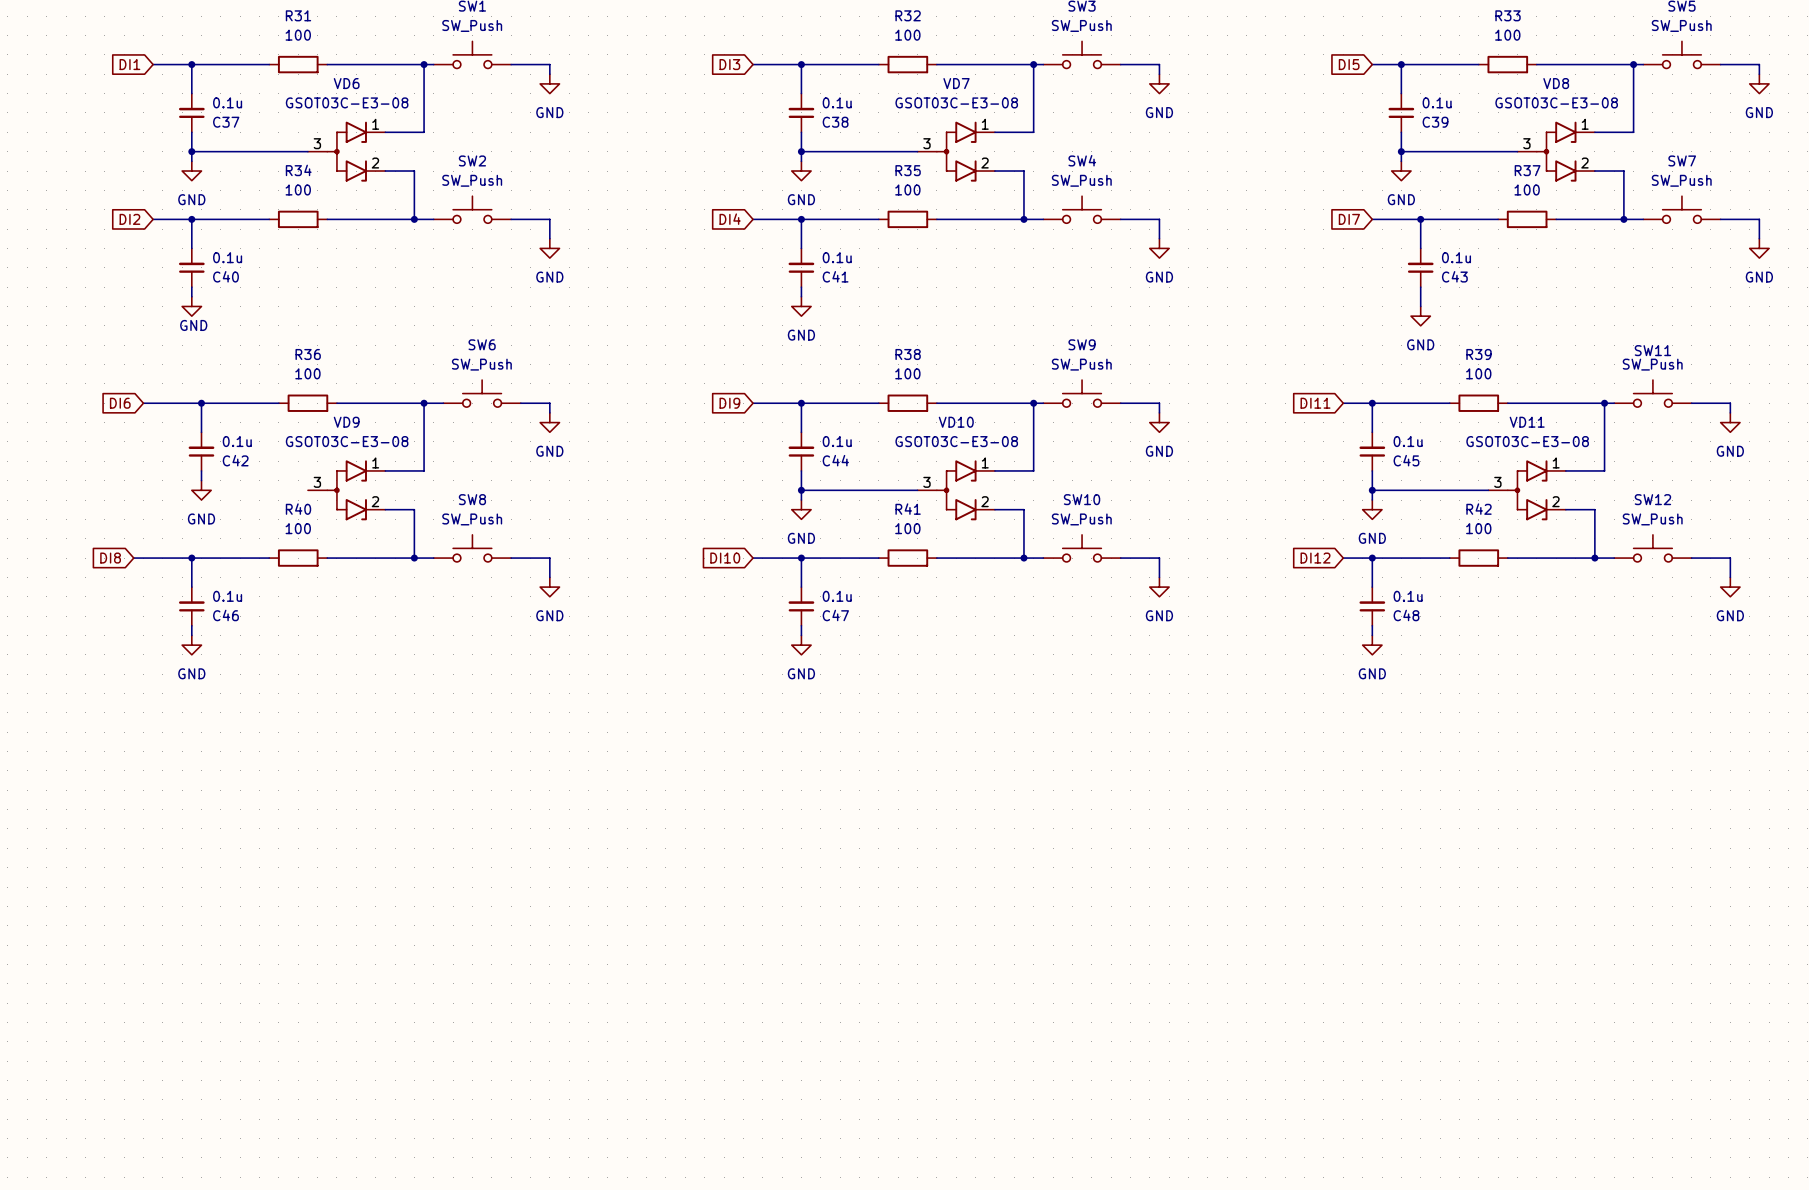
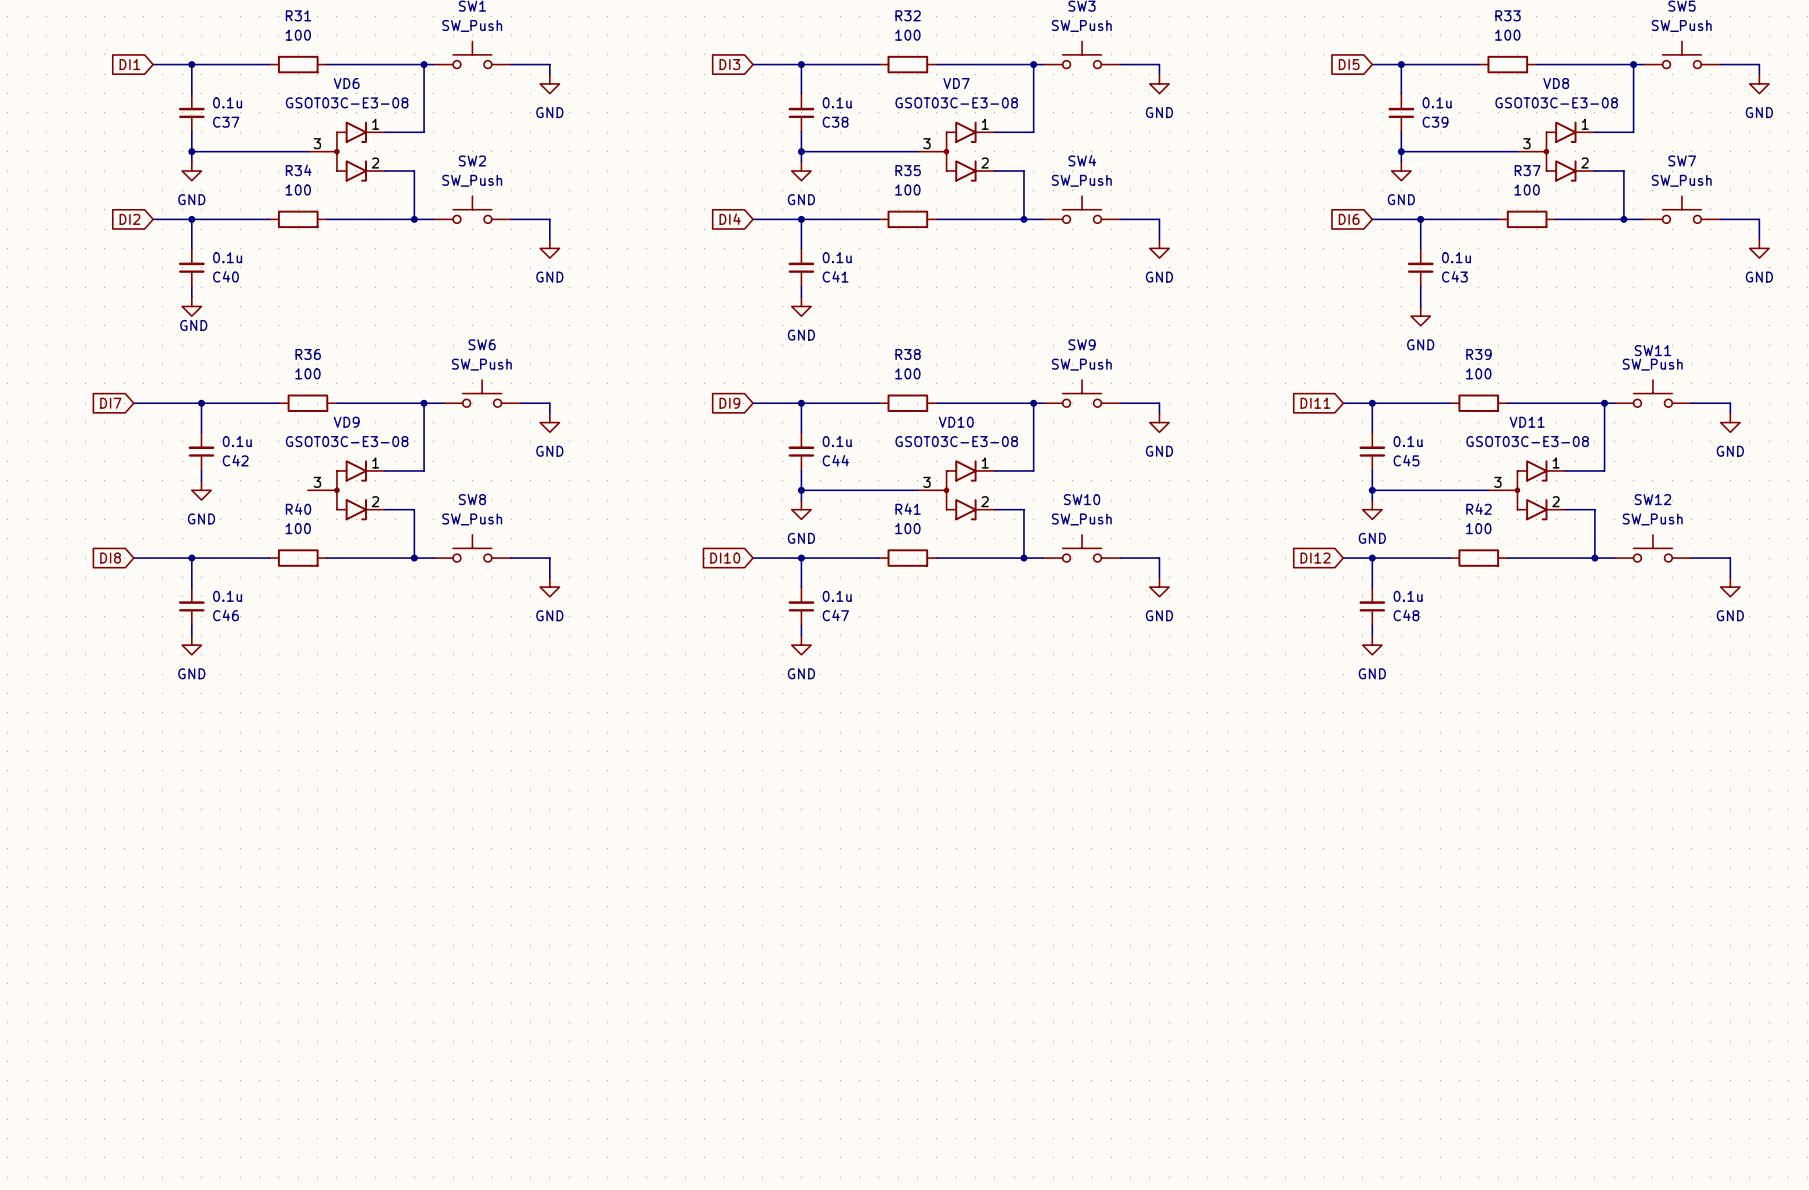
global label: DI7 (1349, 219) -> DI6 (1349, 219)
global label: DI6 (120, 403) -> DI7 (110, 403)
wire: none -> (133, 403) (143, 403)

